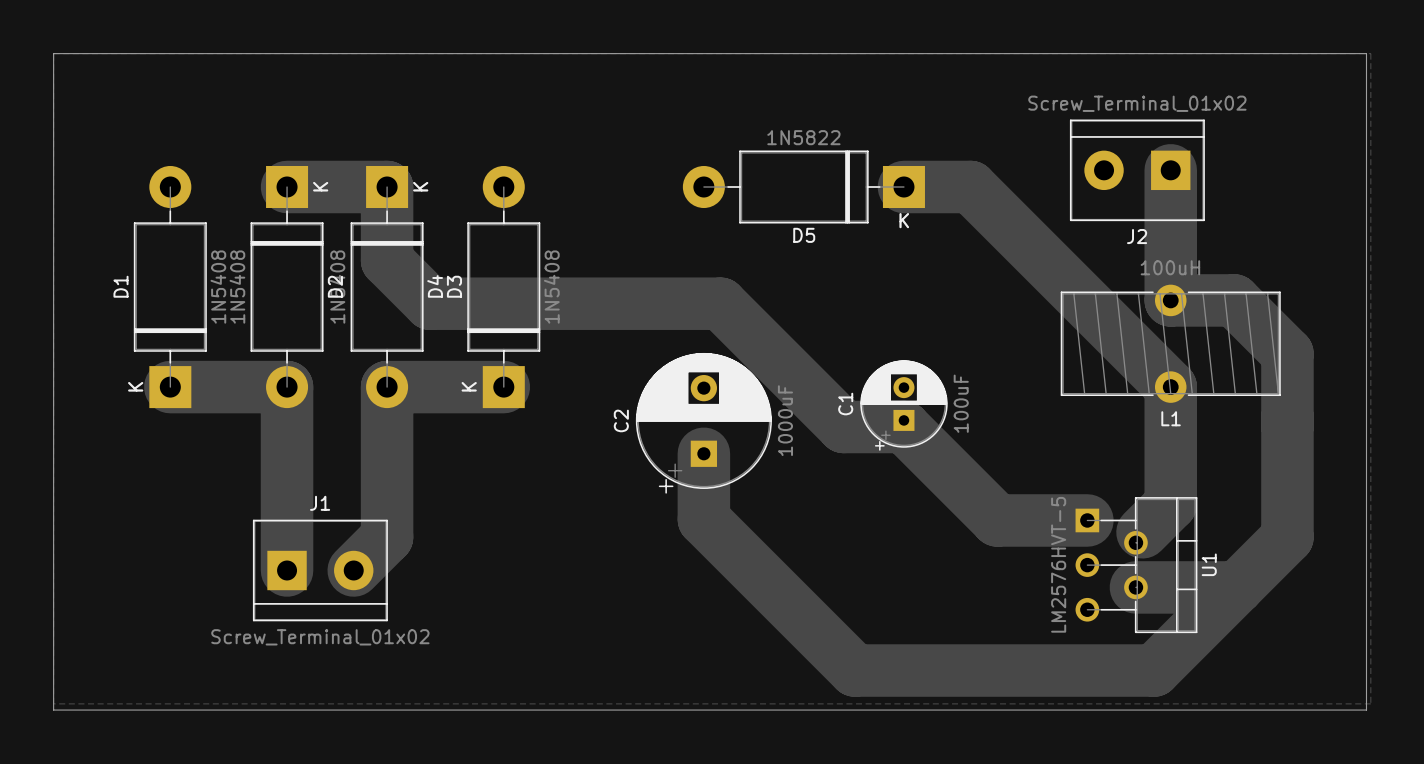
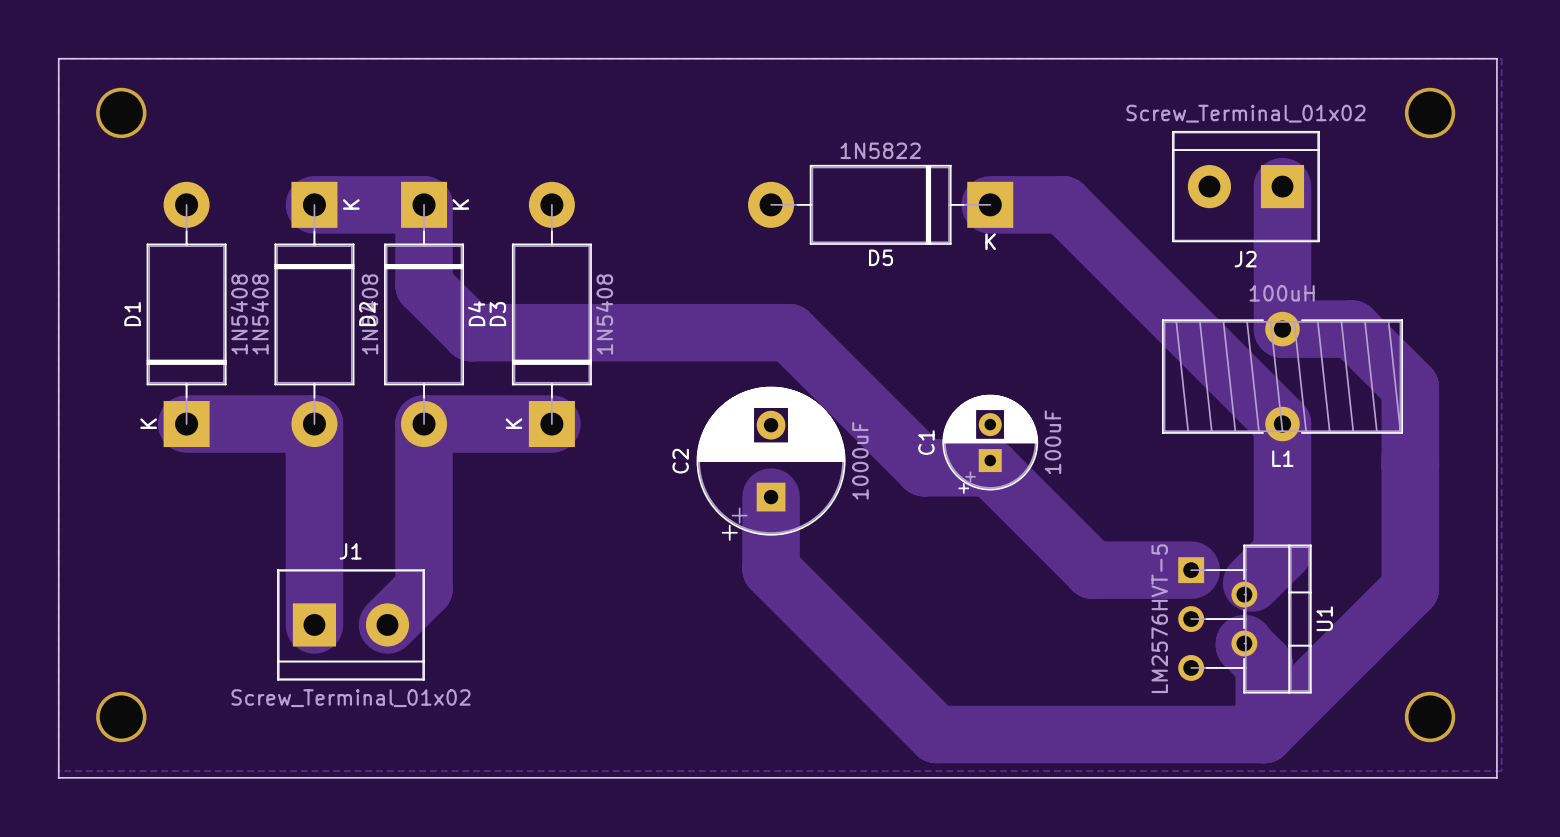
via: none -> (121, 112)
via: none -> (1430, 112)
track: (1135, 587) (1237, 587) -> (1244, 643) (1264, 664) (1264, 734)
via: none -> (121, 716)
via: none -> (1430, 716)

